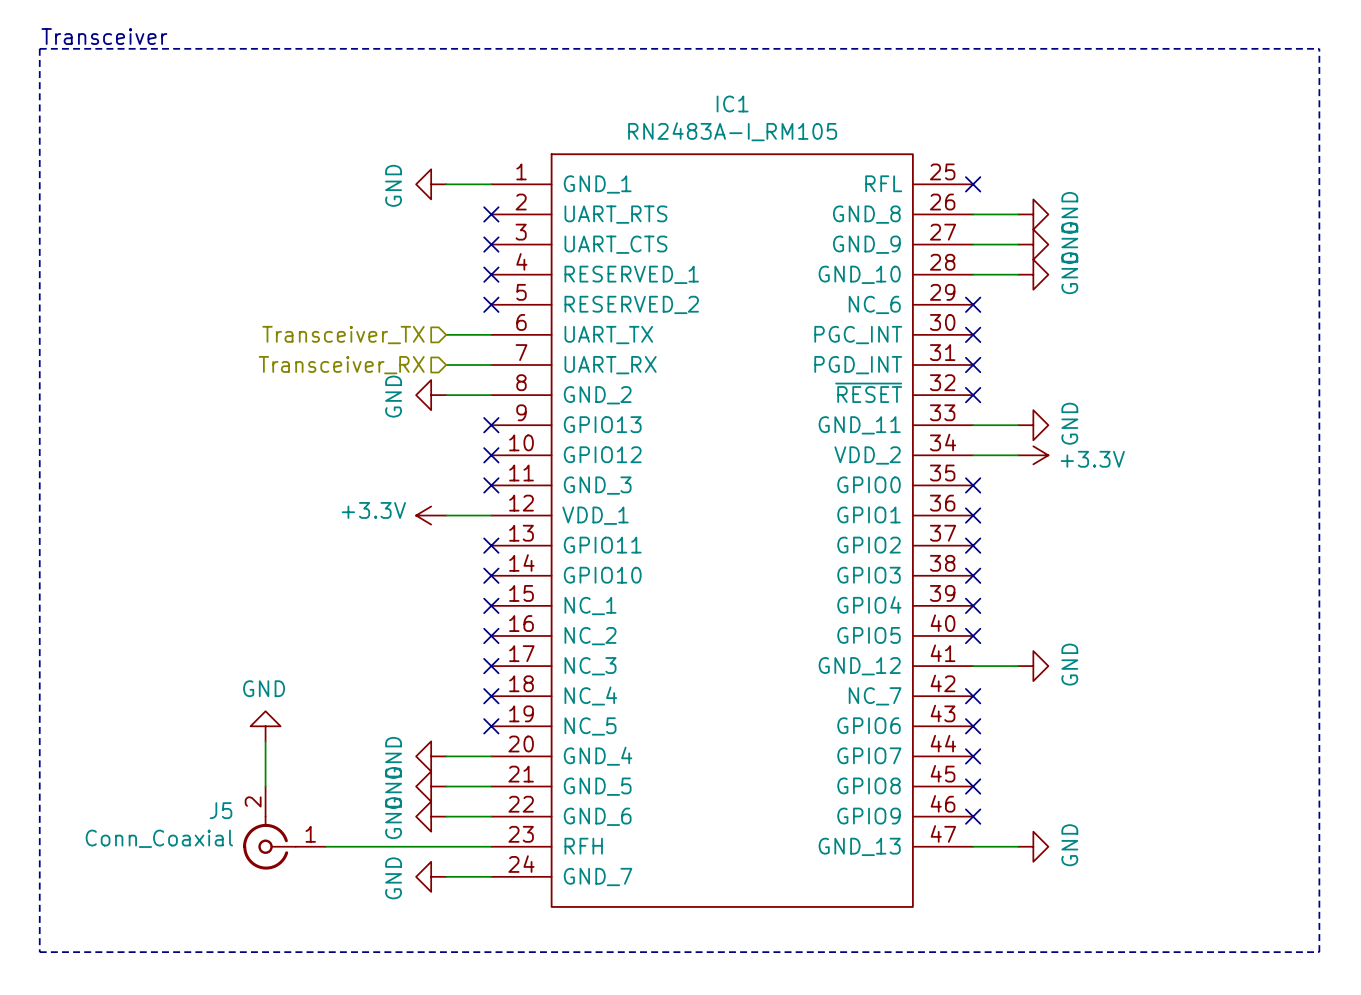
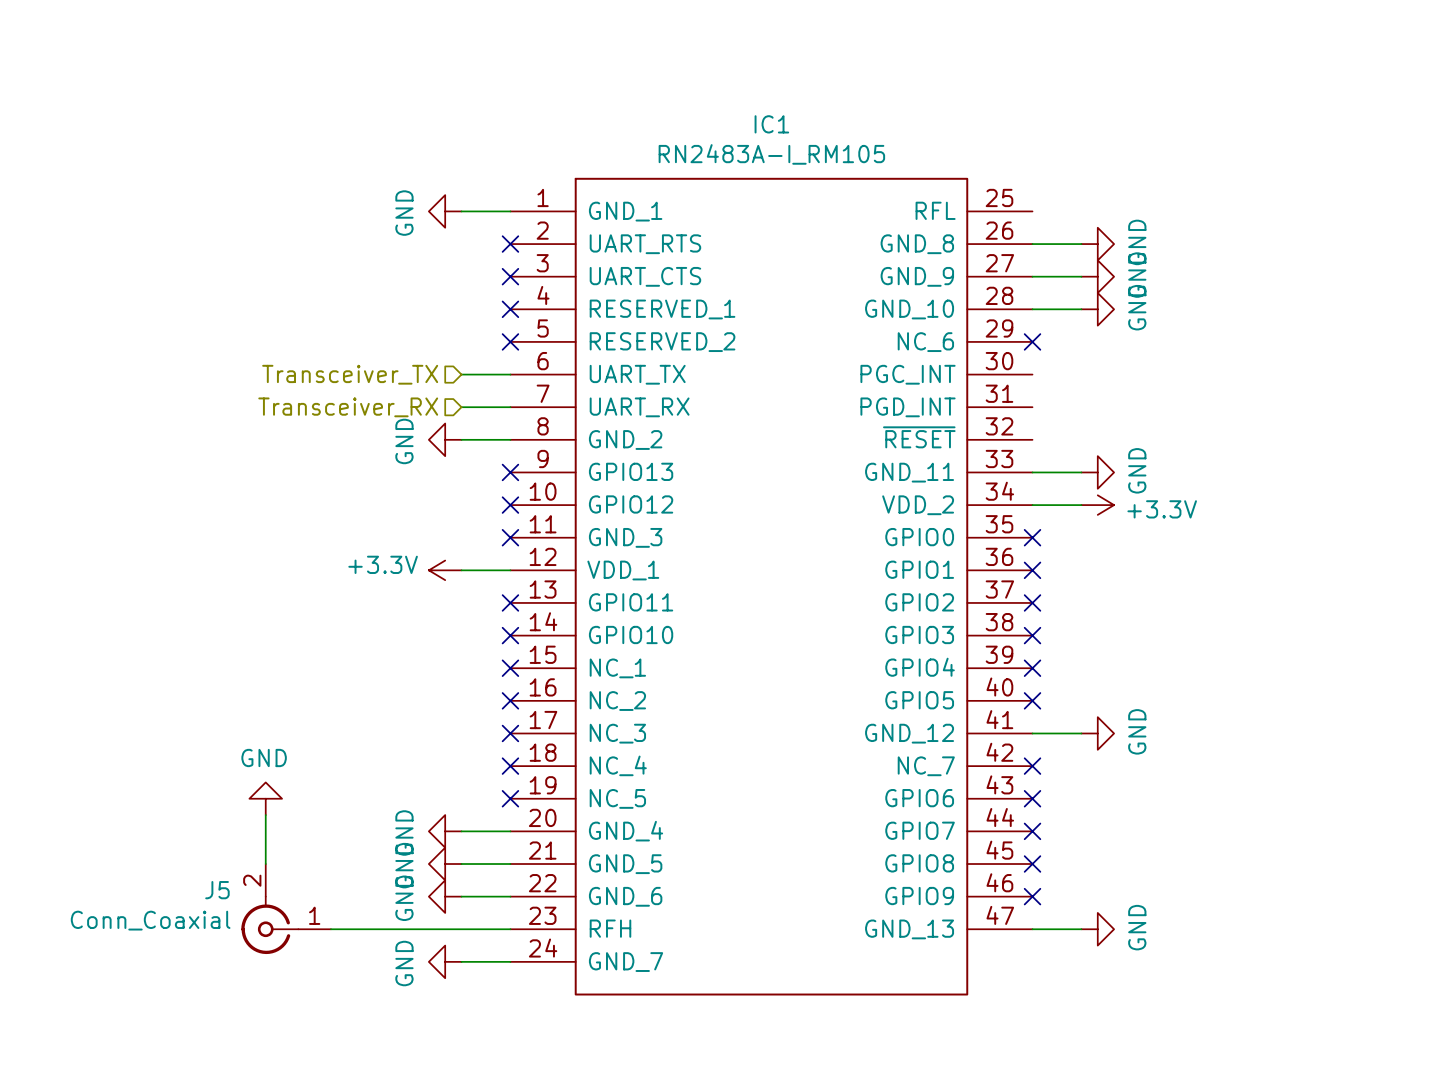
text: Transceiver (104, 36) -> none
line: (39, 48) (39, 952) (1319, 952) (1319, 48) (39, 48) -> none
no-connect mark: (973, 184) -> none
no-connect mark: (973, 334) -> none
no-connect mark: (973, 364) -> none
no-connect mark: (973, 395) -> none

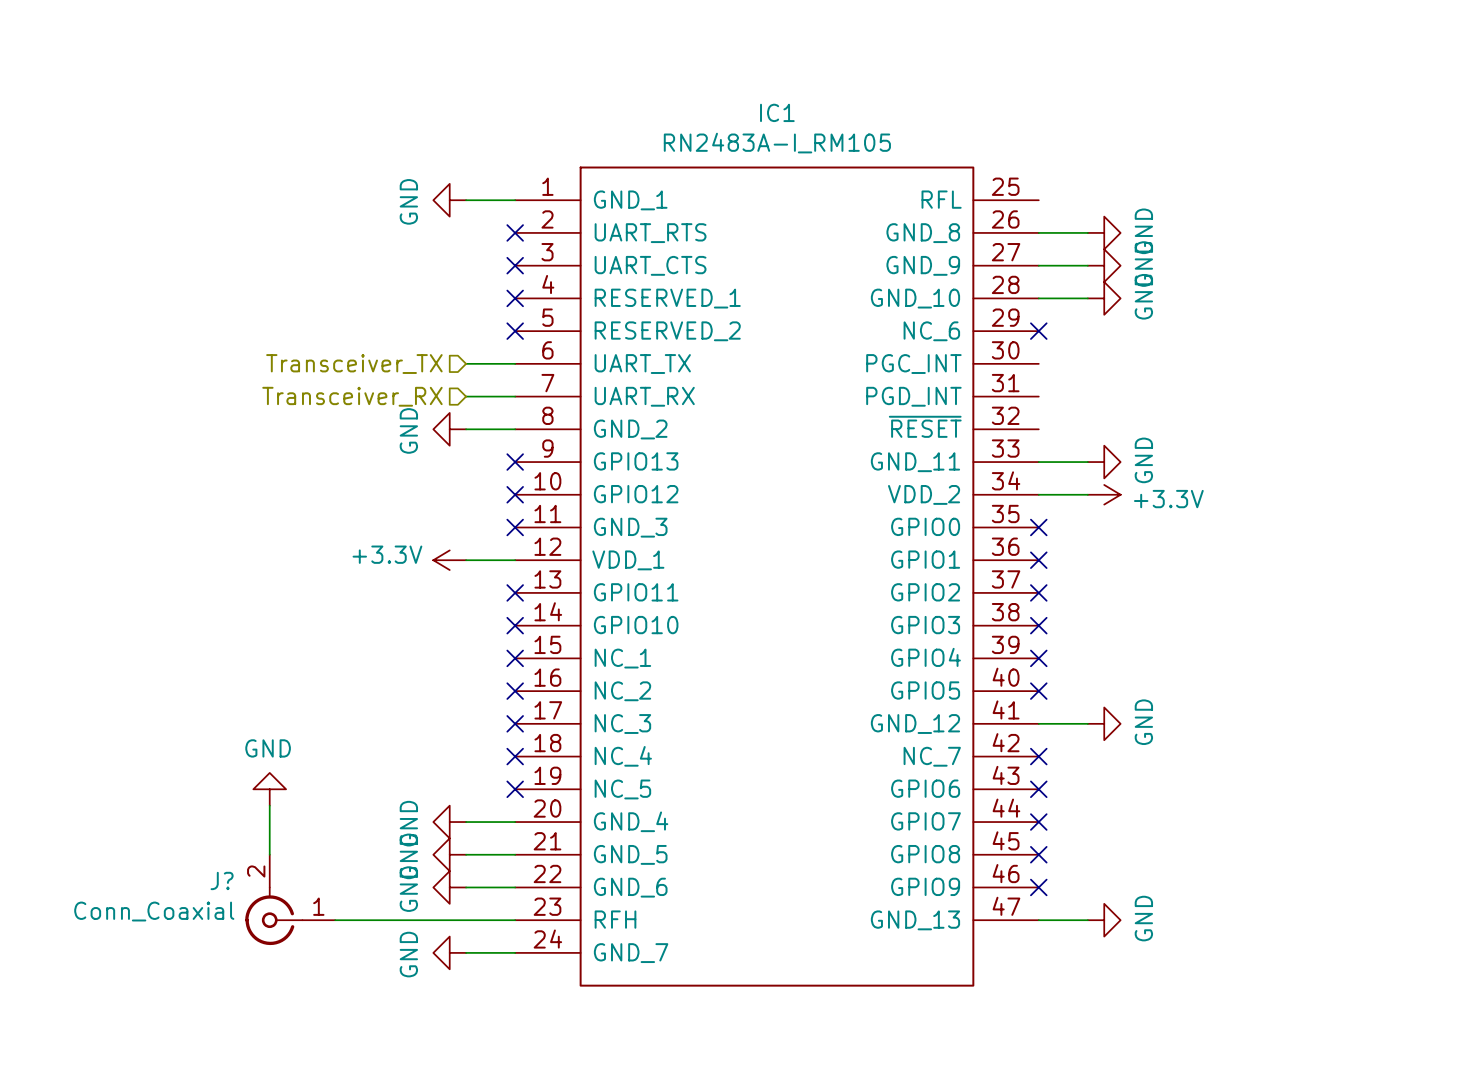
J5 name: J5 (217, 890) -> J? (222, 880)

